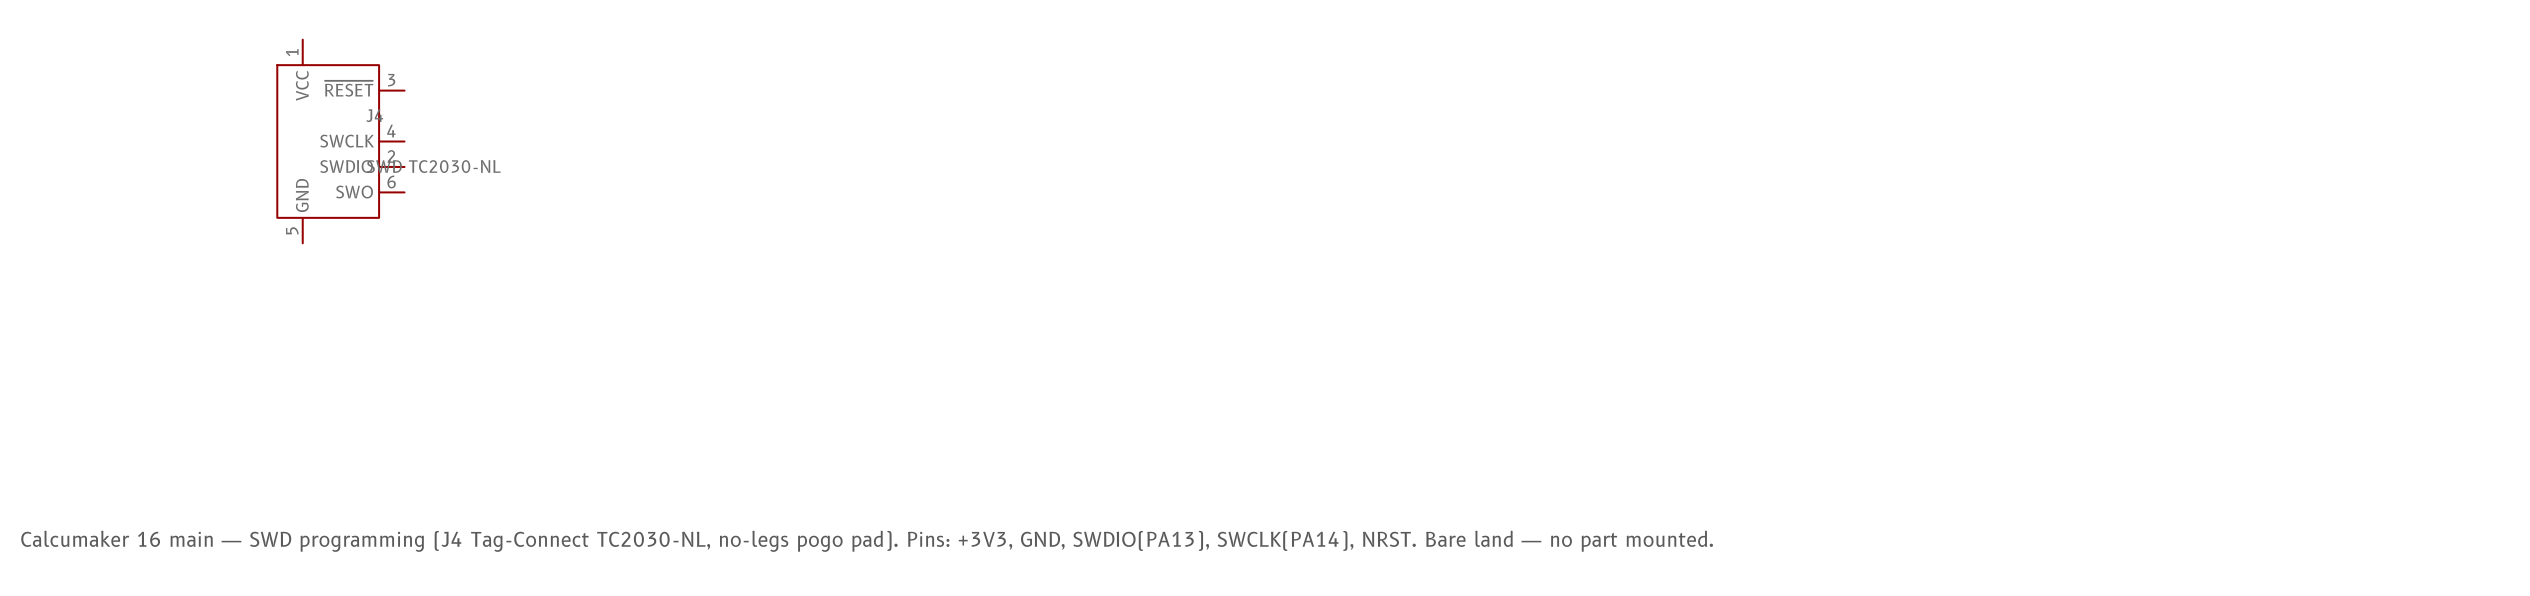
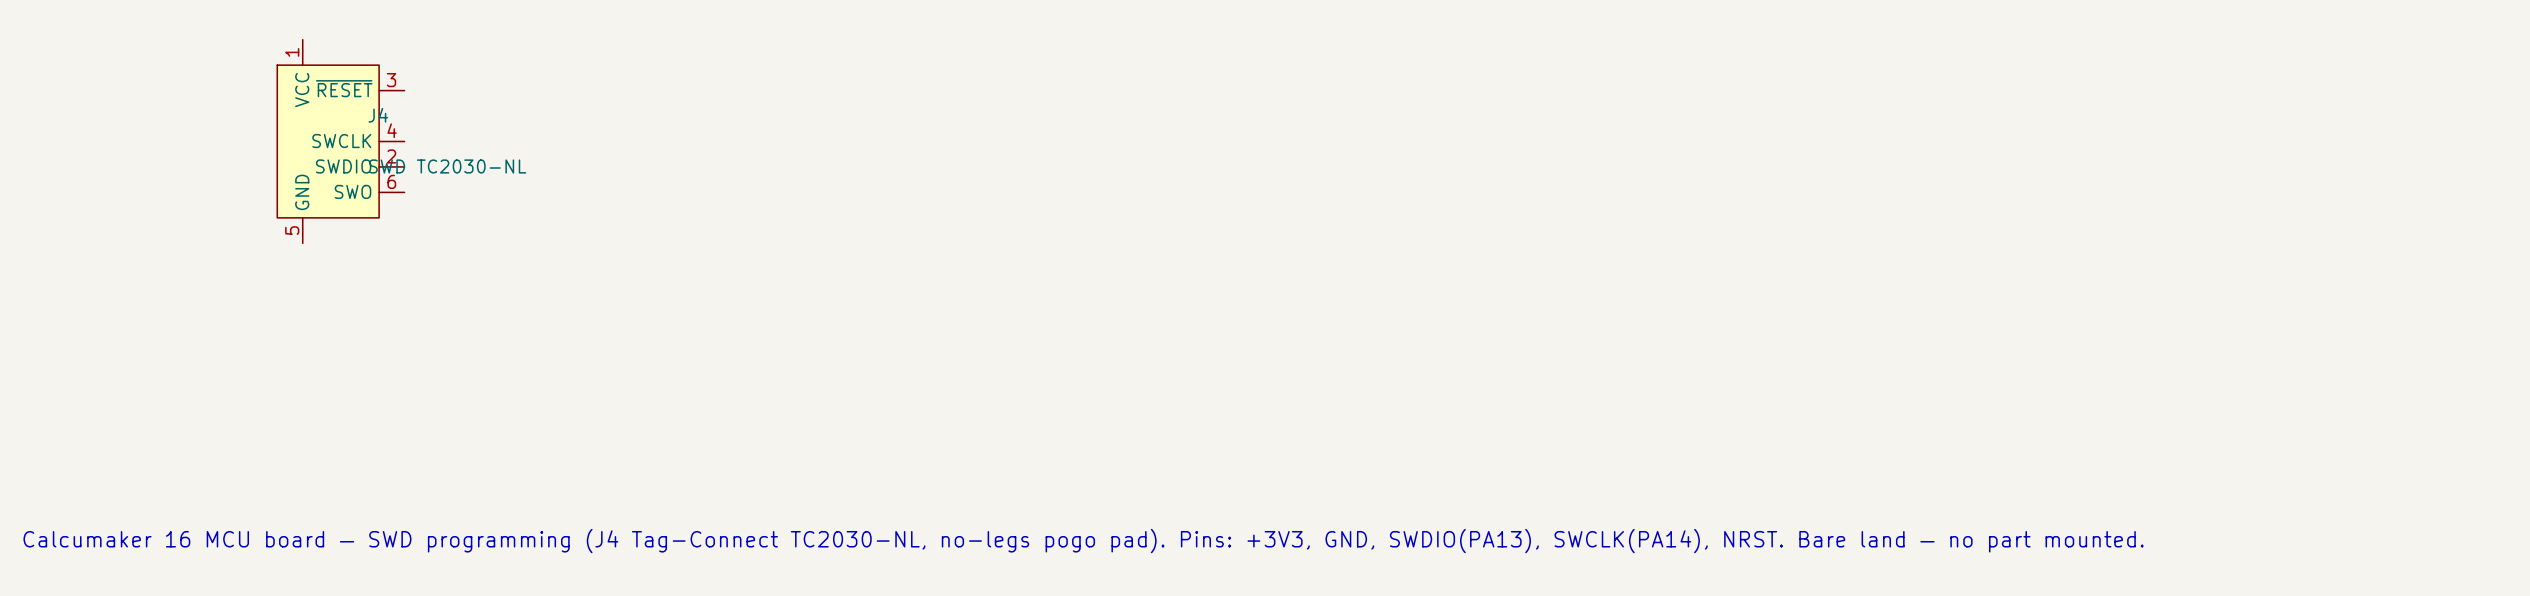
text: Calcumaker 16 main — SWD programming (J4 Tag-Connect TC2030-NL, no-legs pogo pad). Pins: +3V3, GND, SWDIO(PA13), SWCLK(PA14), NRST. Bare land — no part mounted. (867, 541) -> Calcumaker 16 MCU board — SWD programming (J4 Tag-Connect TC2030-NL, no-legs pogo pad). Pins: +3V3, GND, SWDIO(PA13), SWCLK(PA14), NRST. Bare land — no part mounted. (1083, 541)

